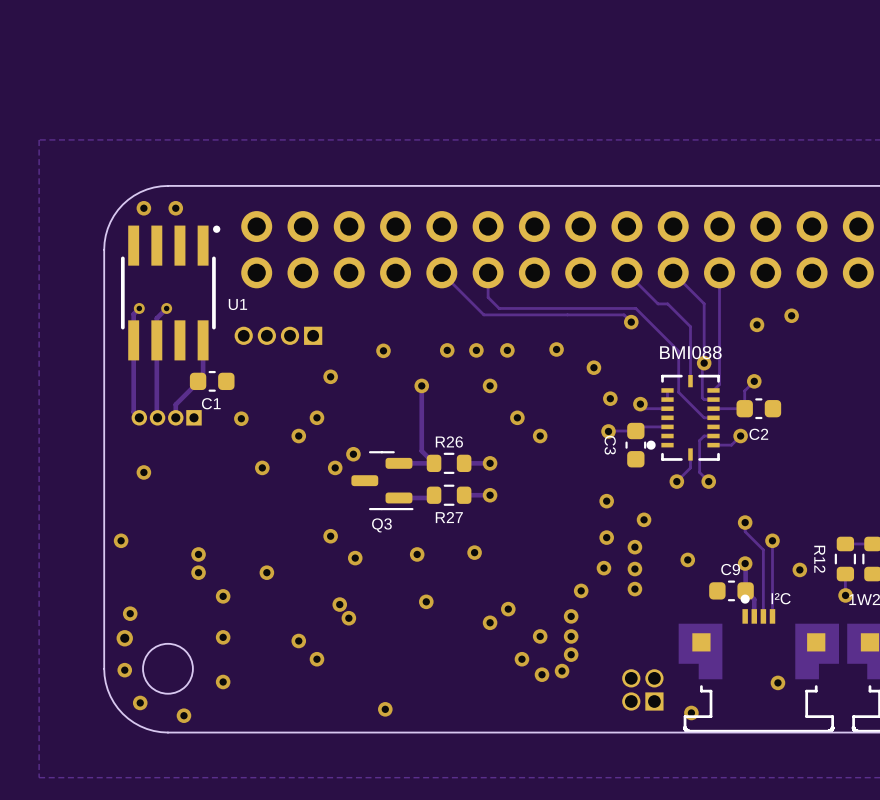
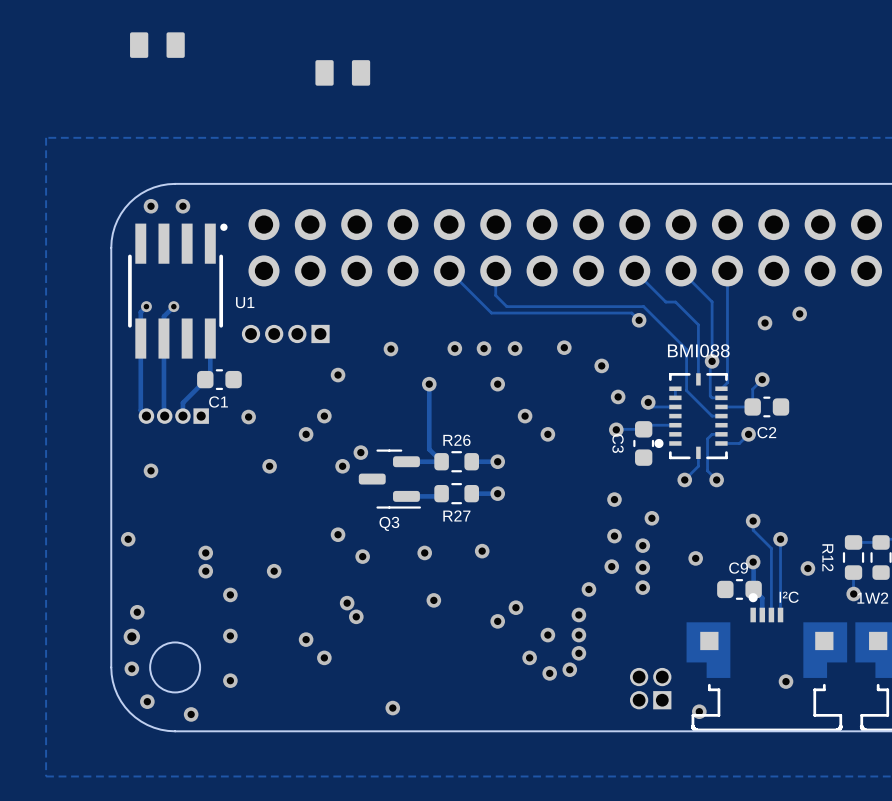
part: none -> (157, 45)
part: none -> (342, 72)

